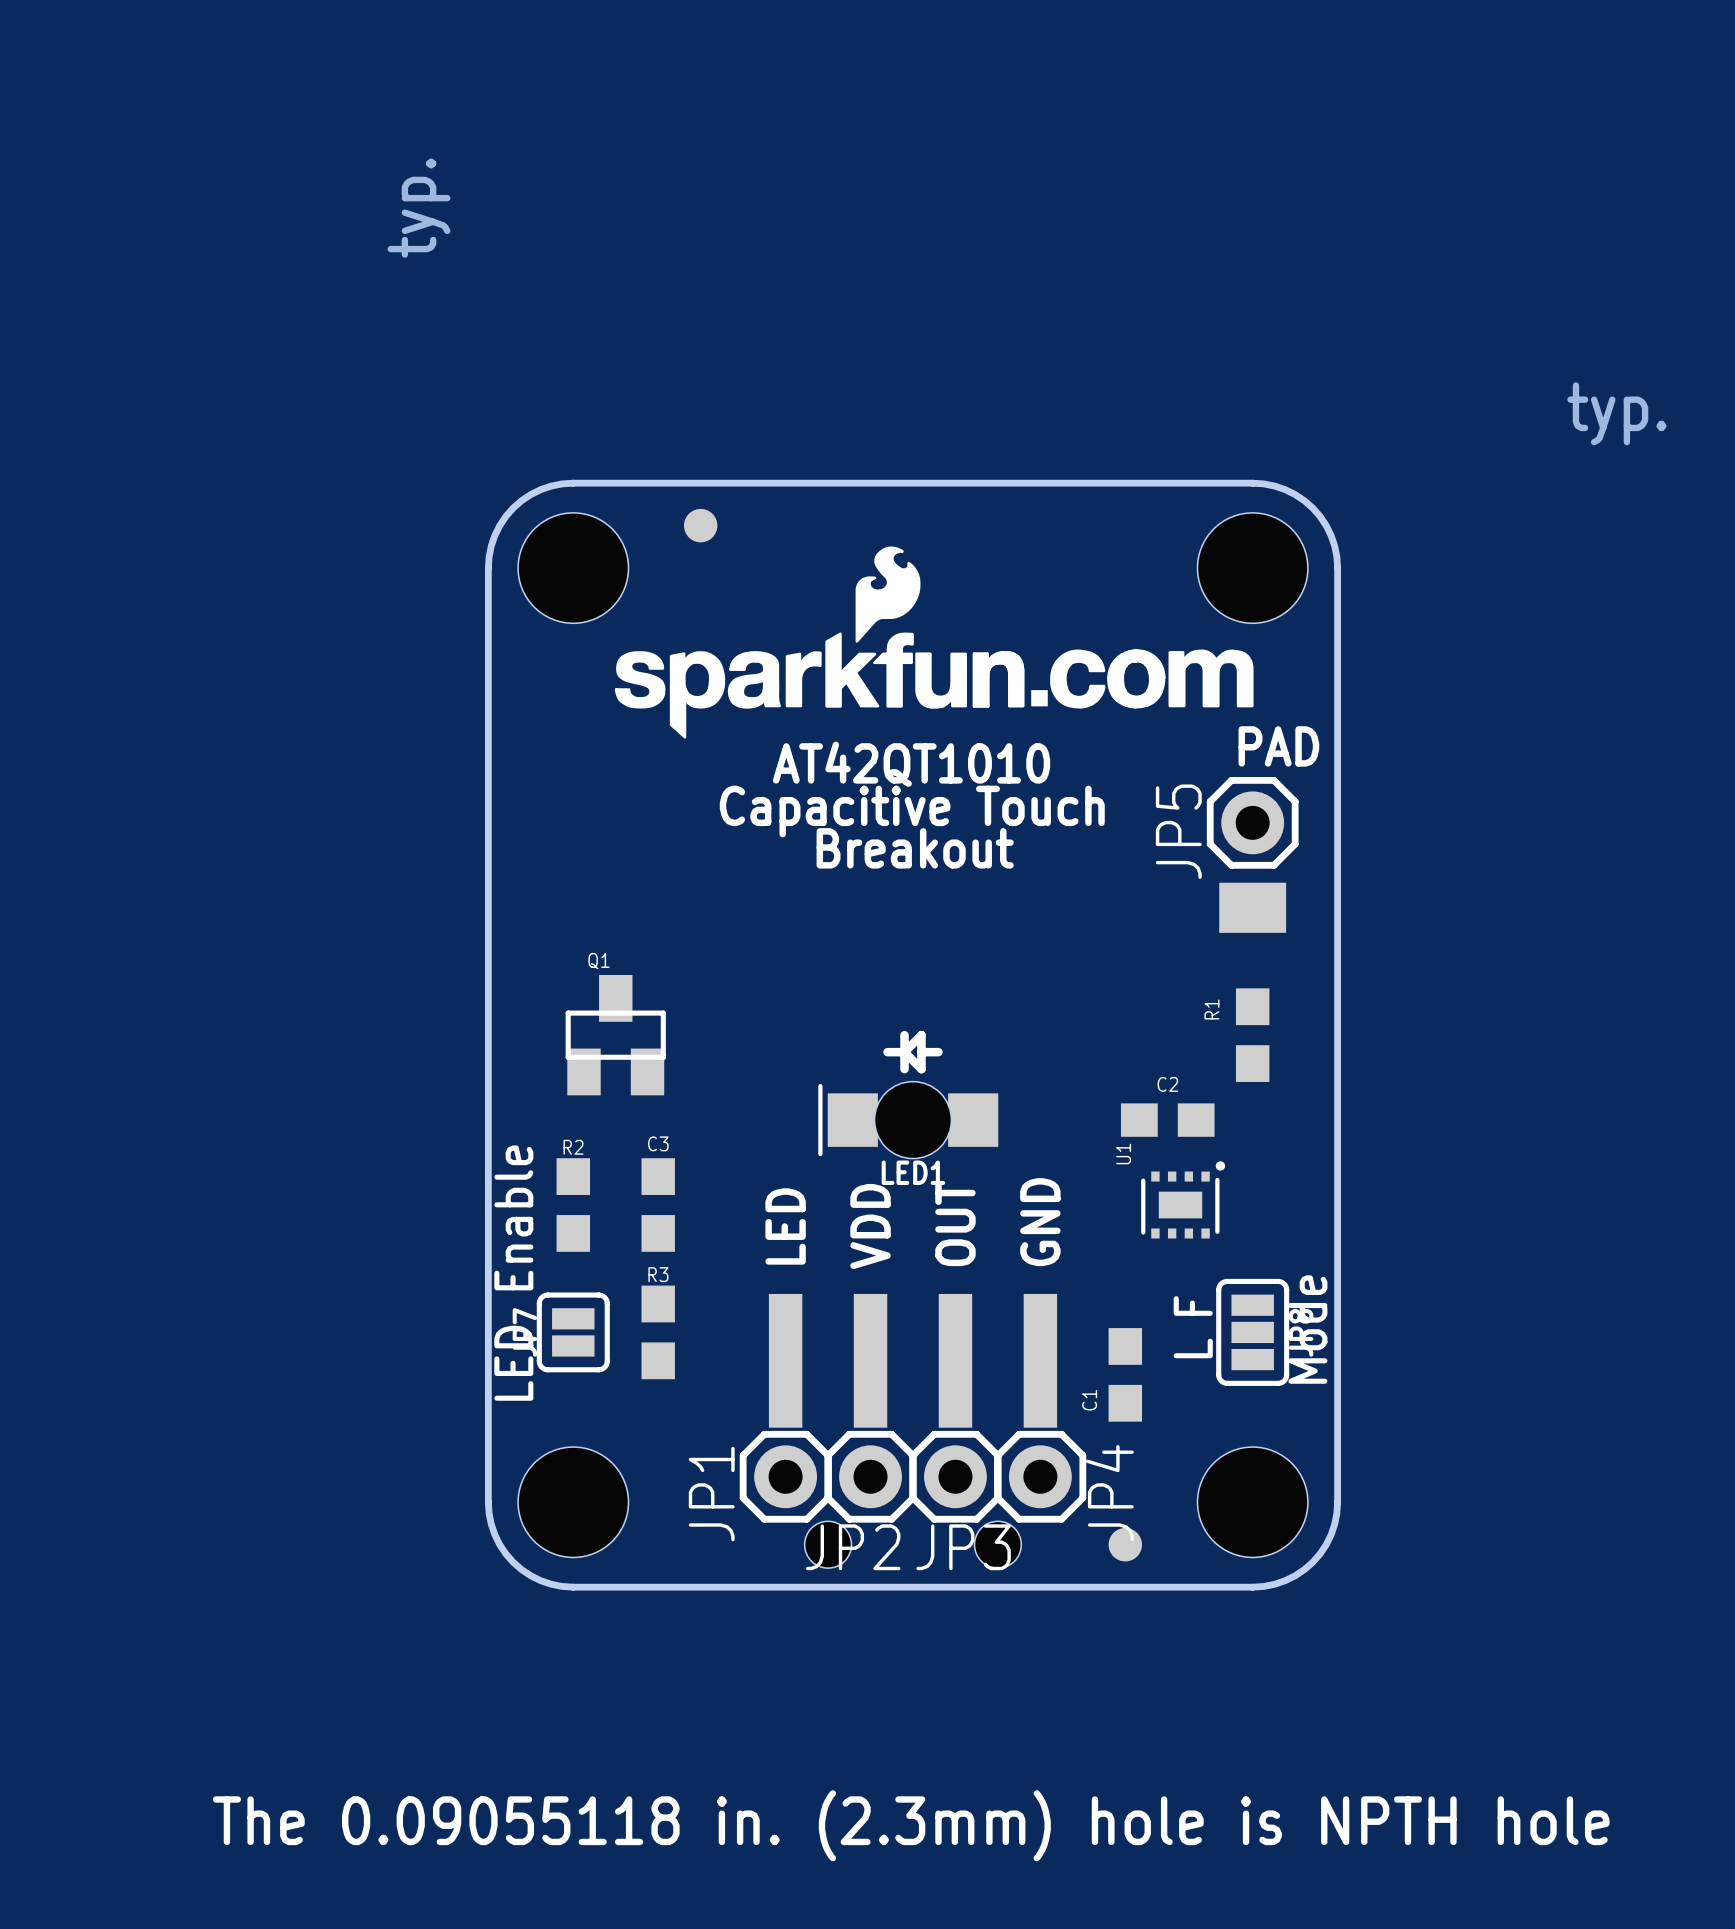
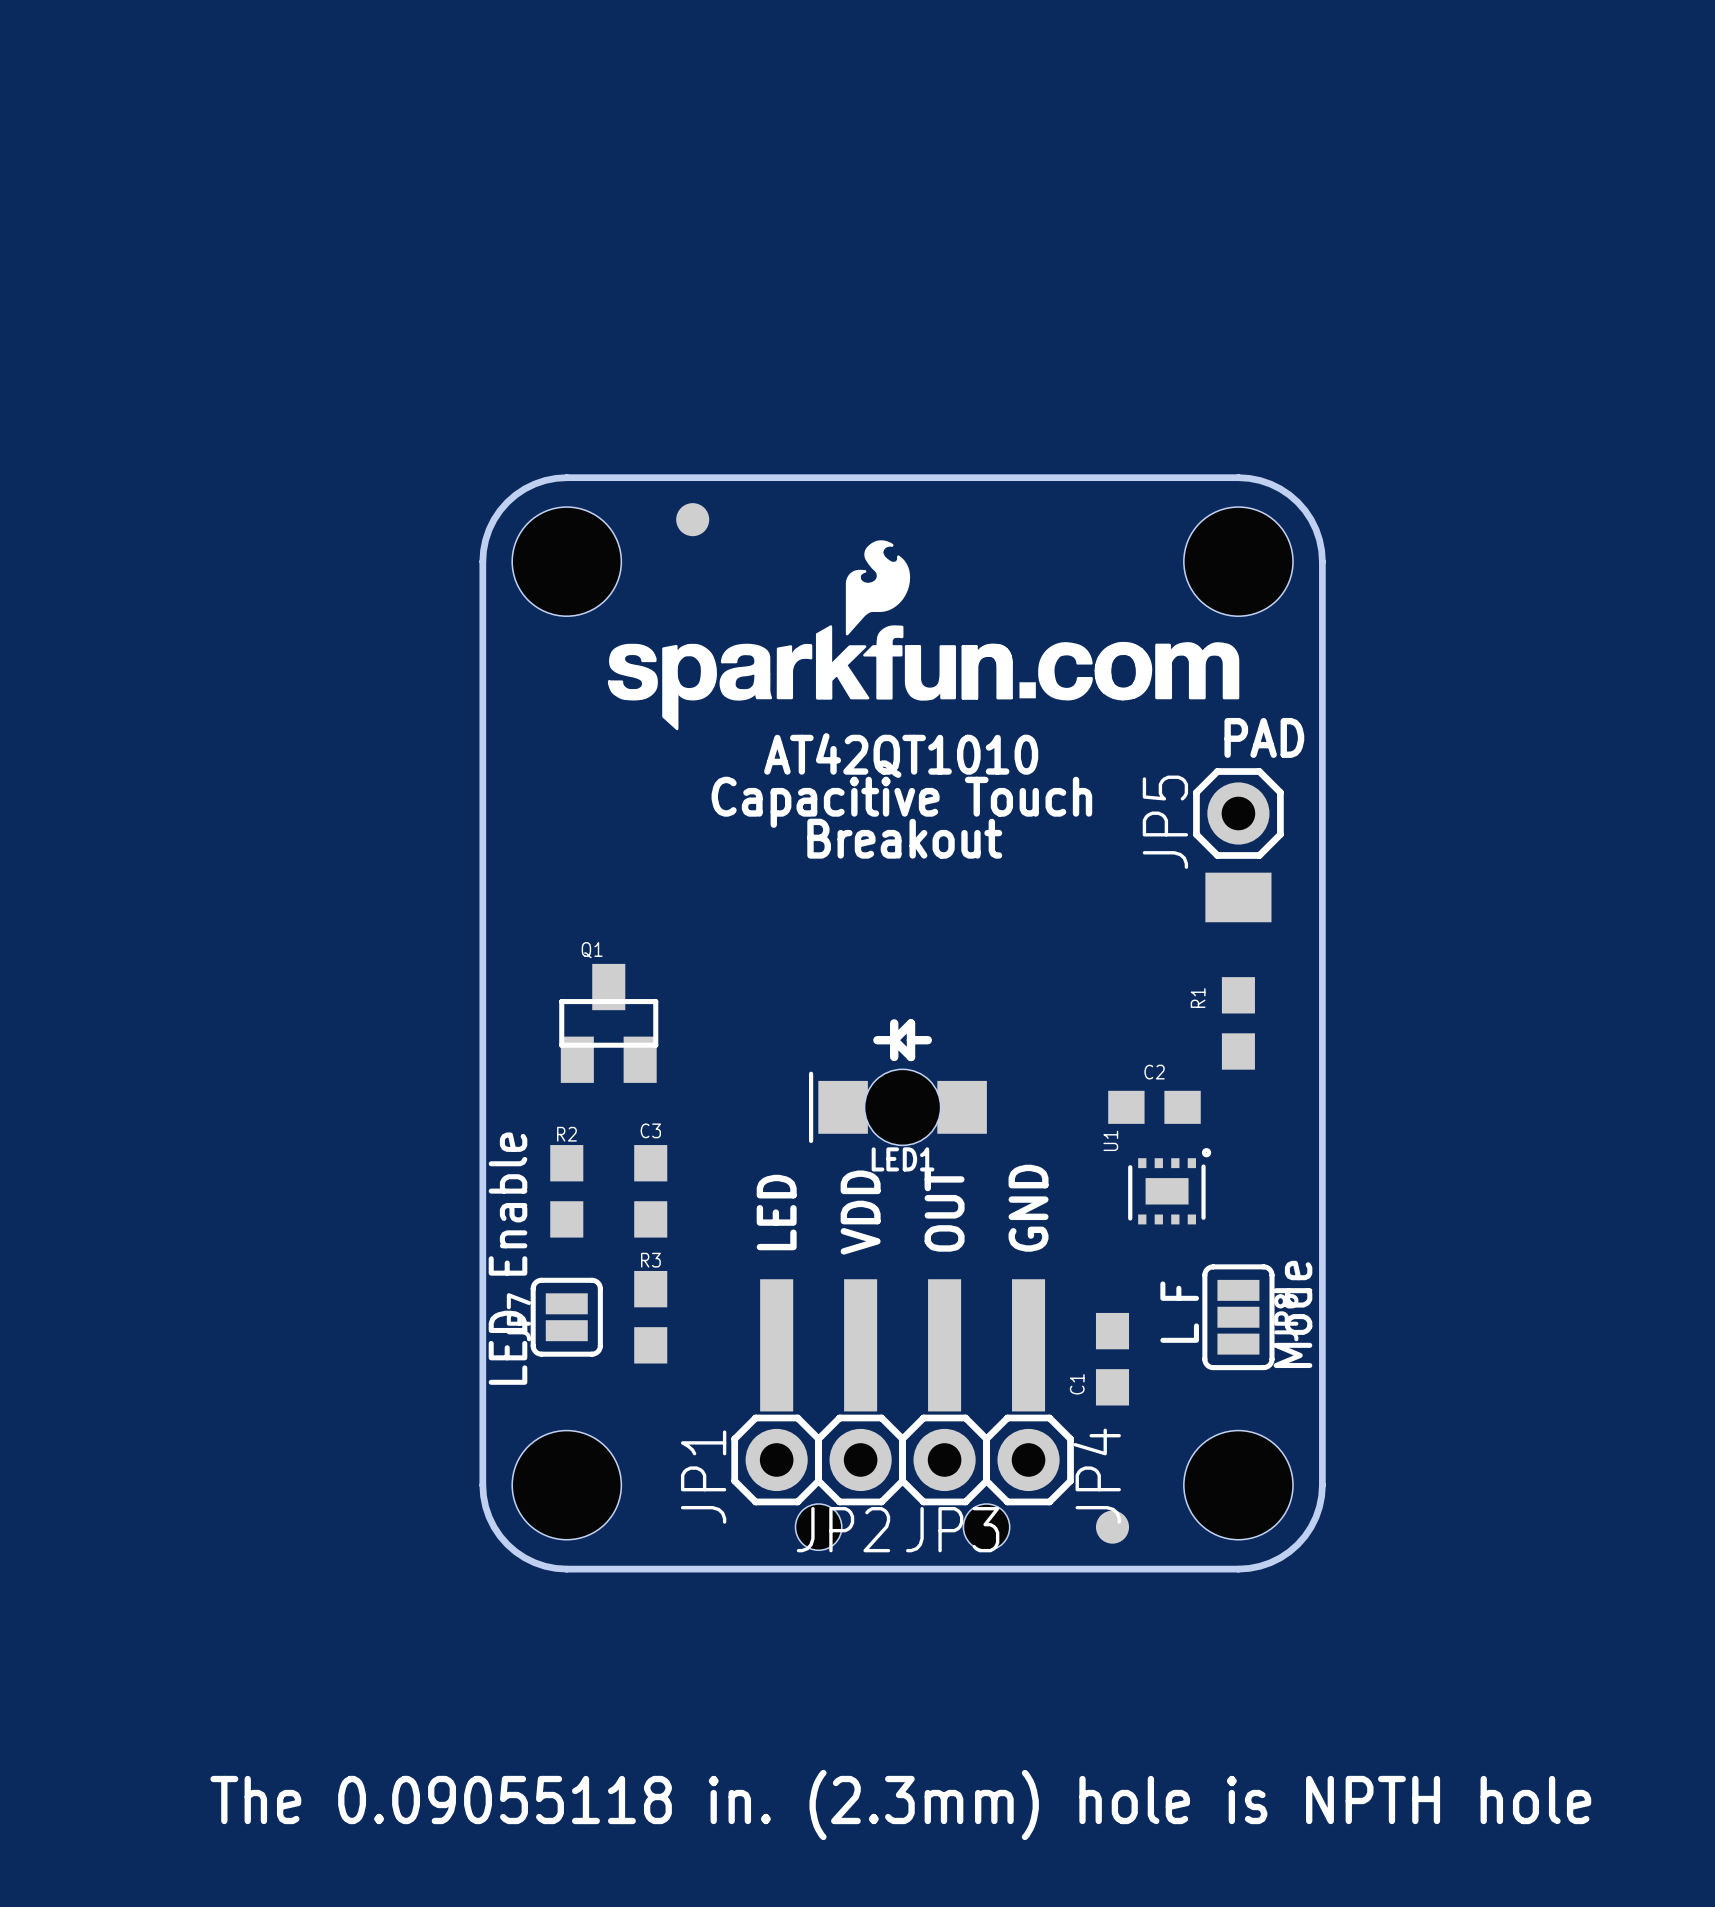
text: typ. (419, 208) -> none
text: typ. (1616, 413) -> none

